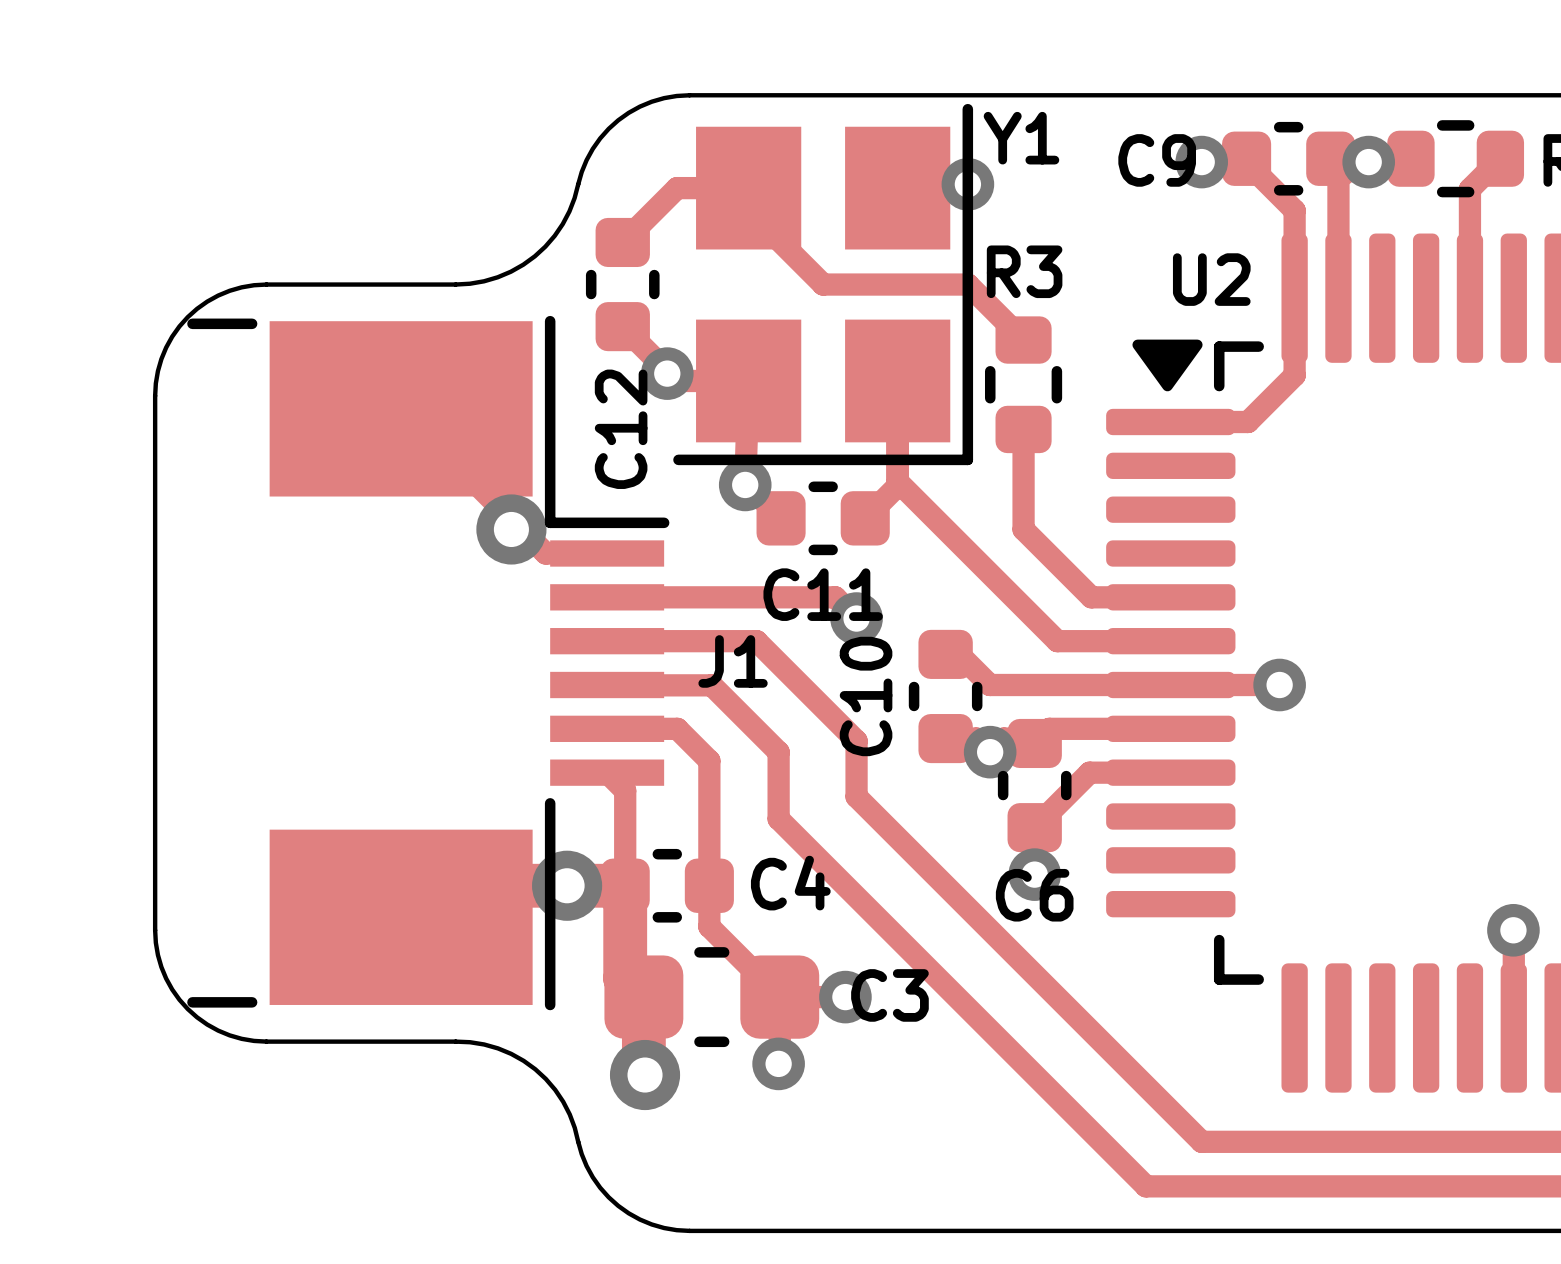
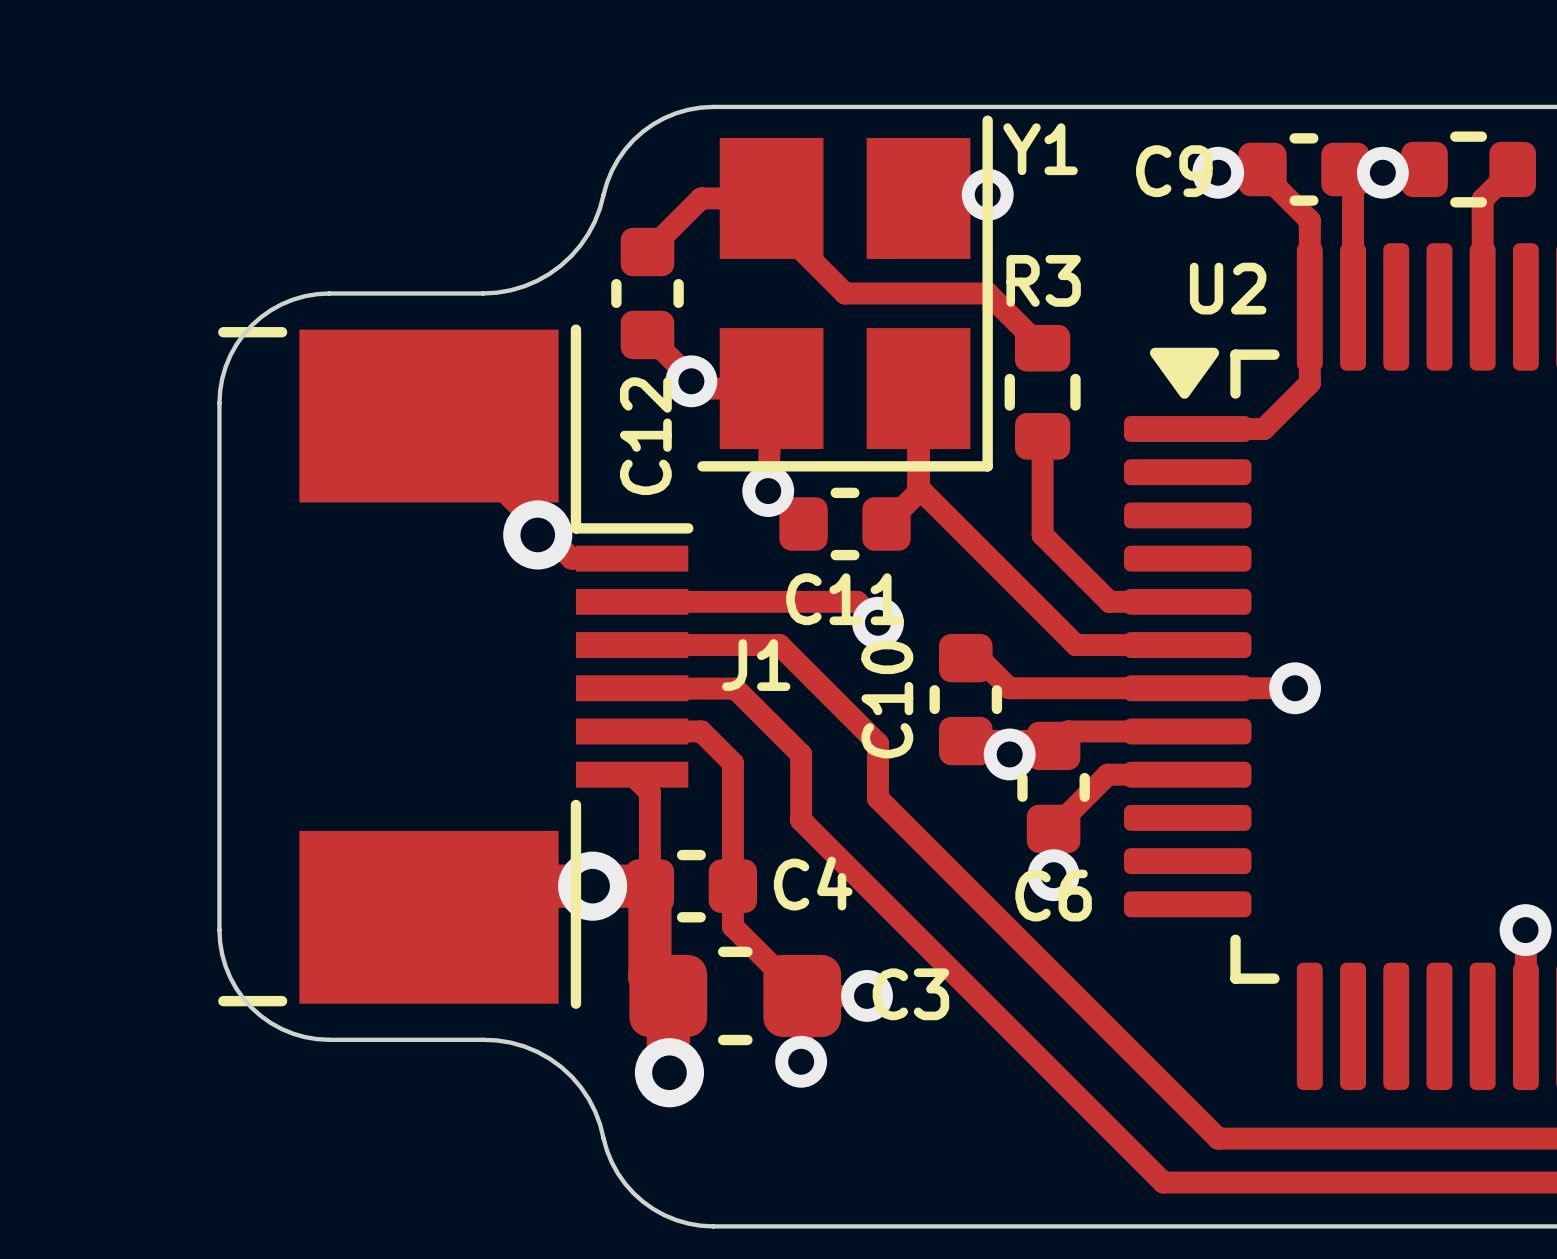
board edge: (299, 284) (266, 284) (241, 287) (218, 295) (197, 308) (179, 326) (166, 347) (157, 371) (155, 395) (155, 930) (157, 955) (166, 978) (179, 999) (207, 1024) (241, 1038) (266, 1041) (299, 1041) -> (329, 293) (292, 299) (270, 310) (251, 325) (236, 344) (225, 367) (219, 403) (219, 930) (222, 954) (236, 988) (260, 1015) (292, 1033) (329, 1039)

